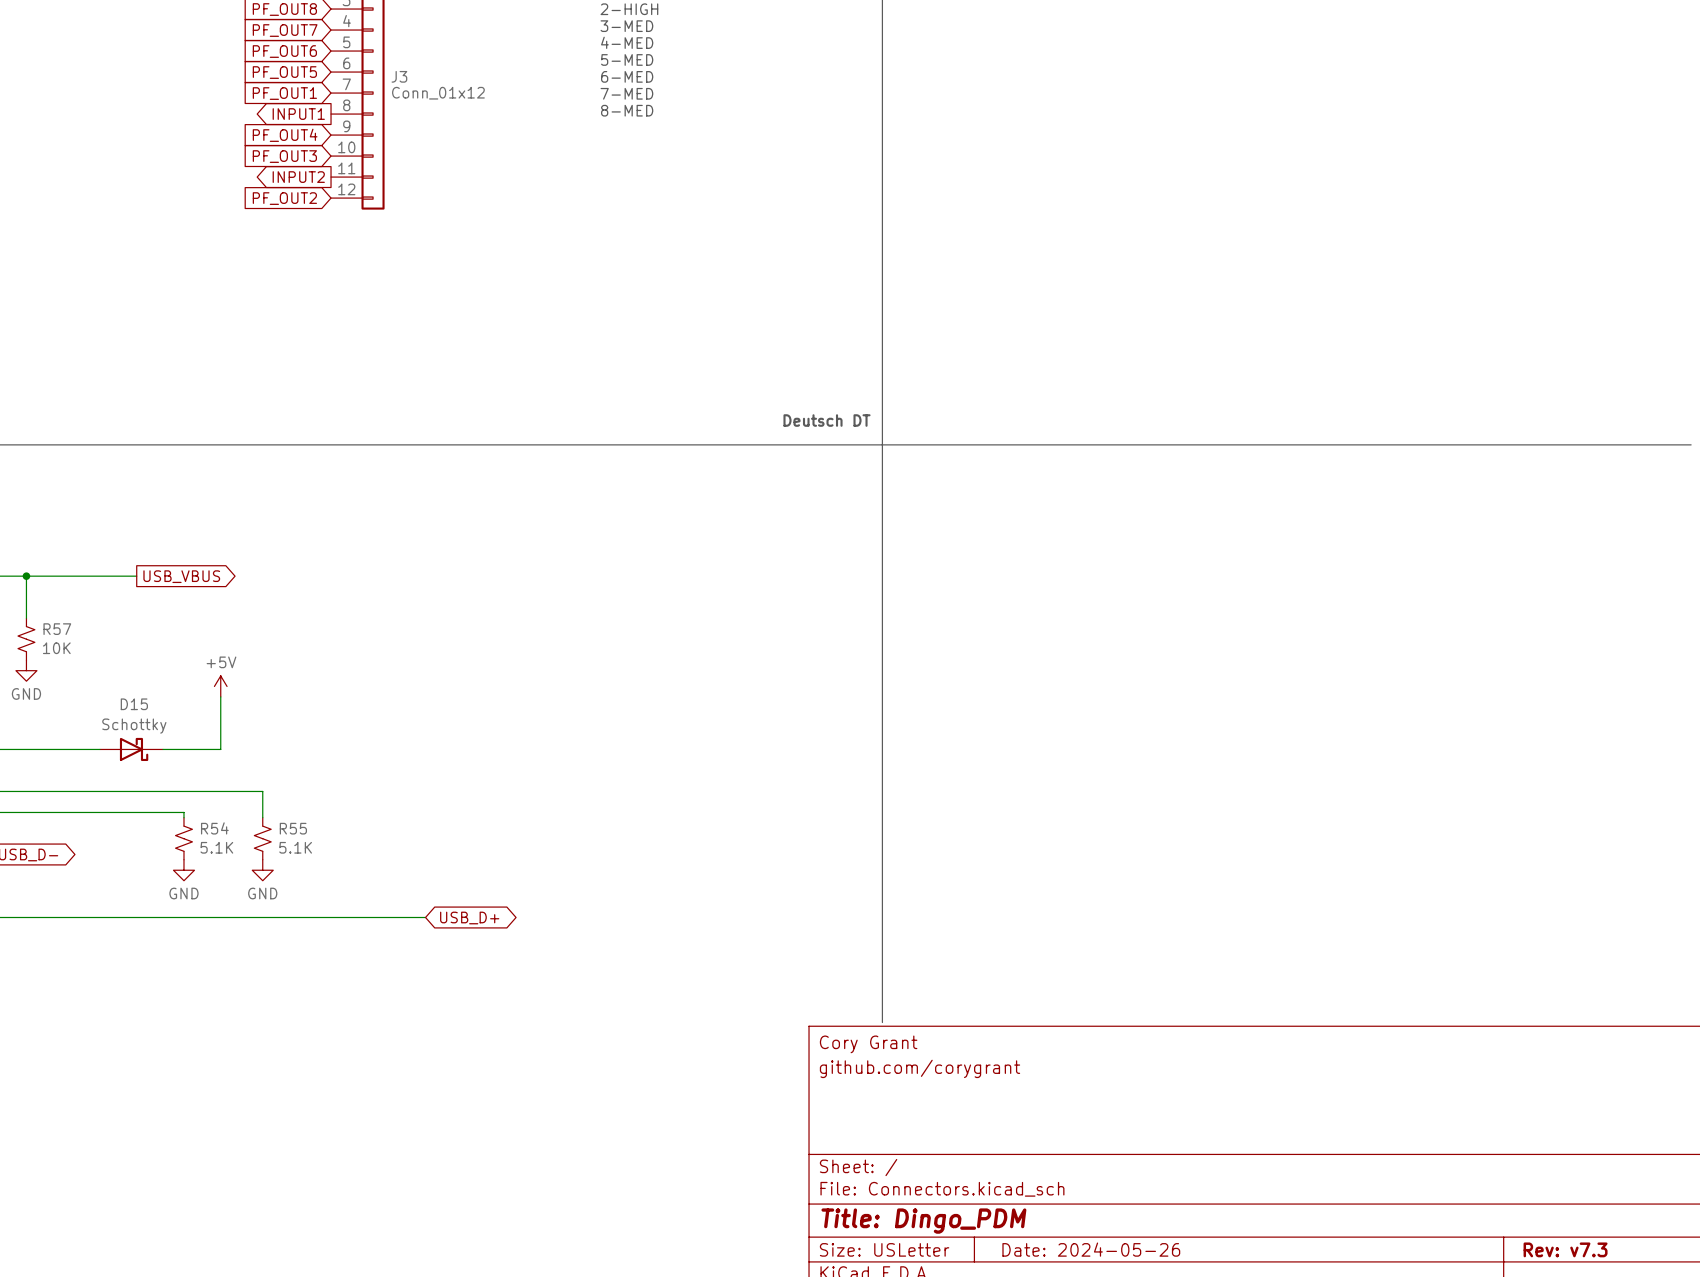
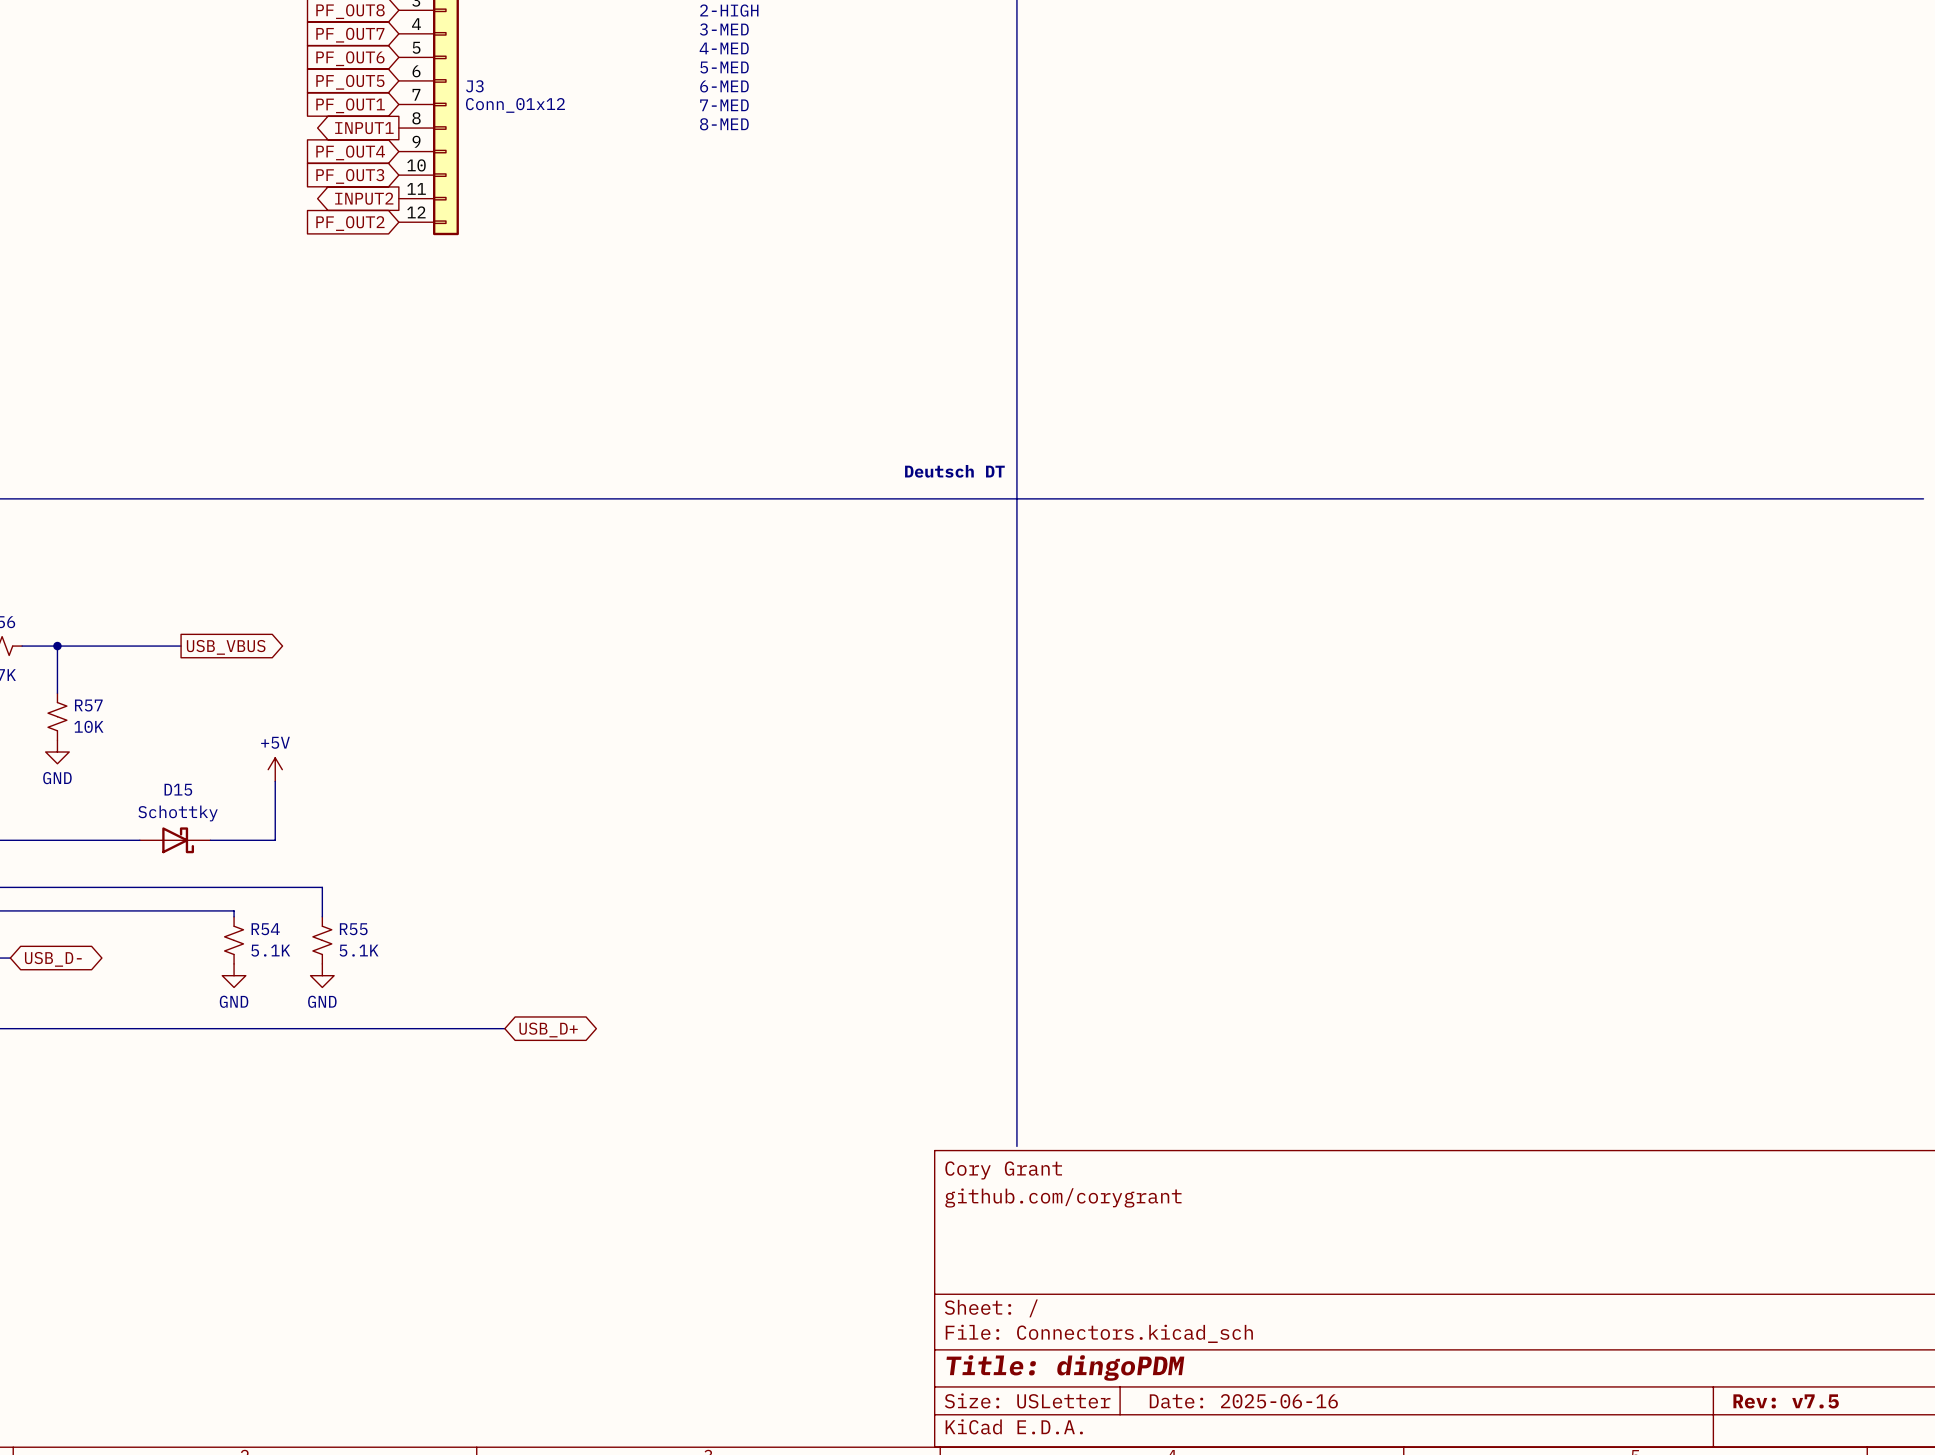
title block: Title: Dingo_PDM (923, 1221) -> Title: dingoPDM (1065, 1367)
title block: Date: 2024-05-26 (1091, 1249) -> Date: 2025-06-16 (1243, 1401)
title block: Rev: v7.3 (1565, 1249) -> Rev: v7.5 (1786, 1401)

